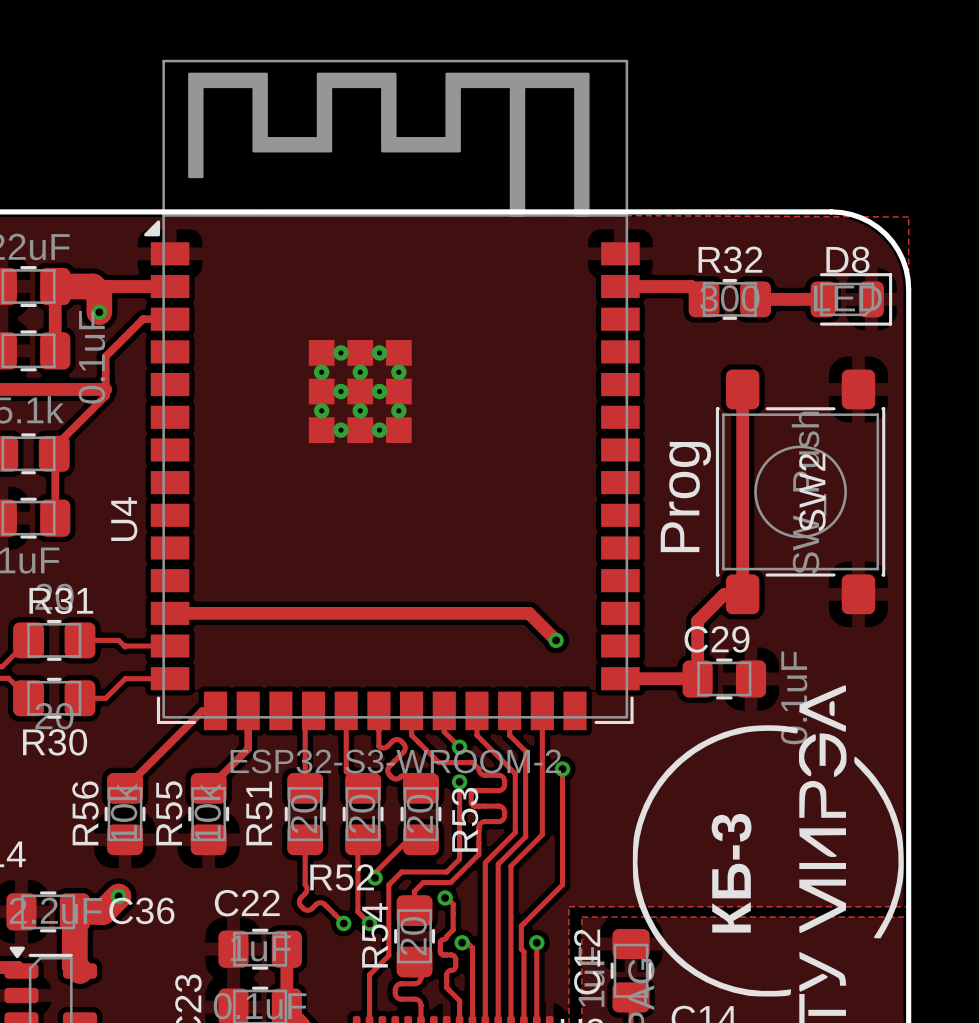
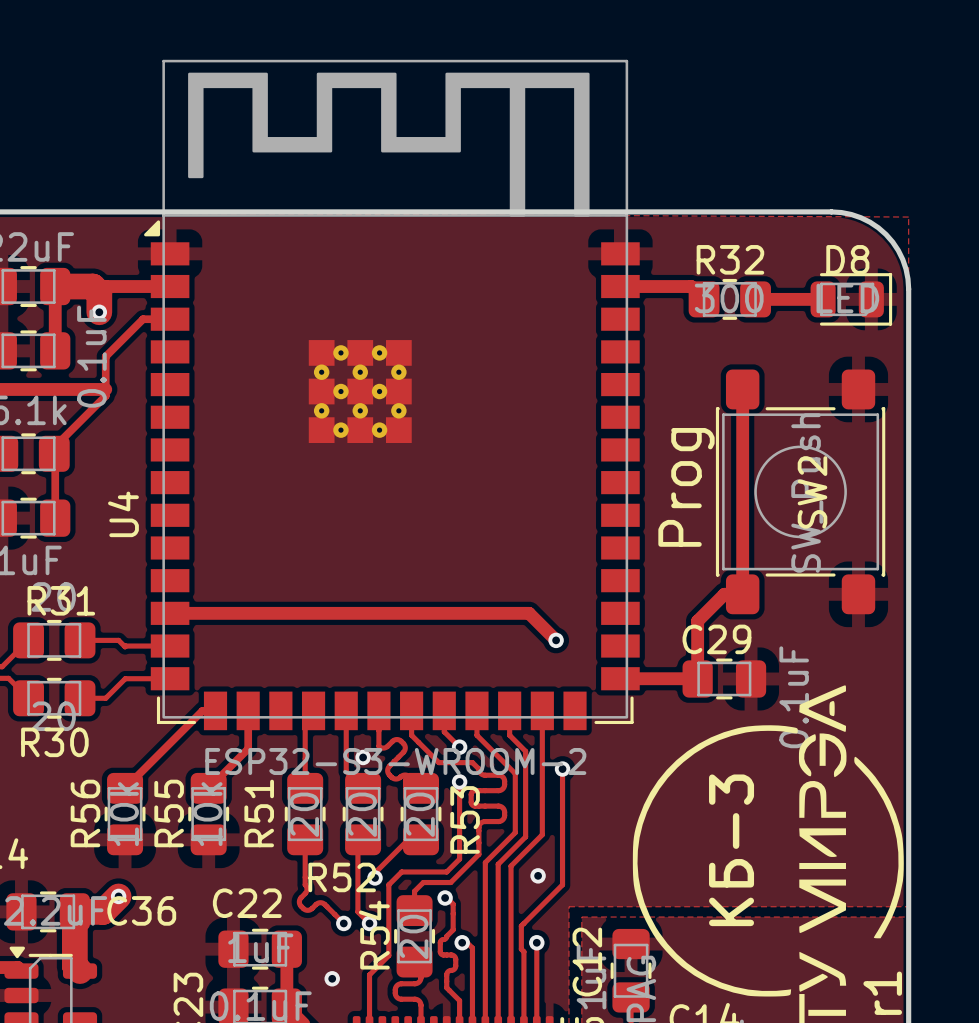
via: none -> (363, 757)
via: none -> (538, 875)
via: none -> (332, 978)

